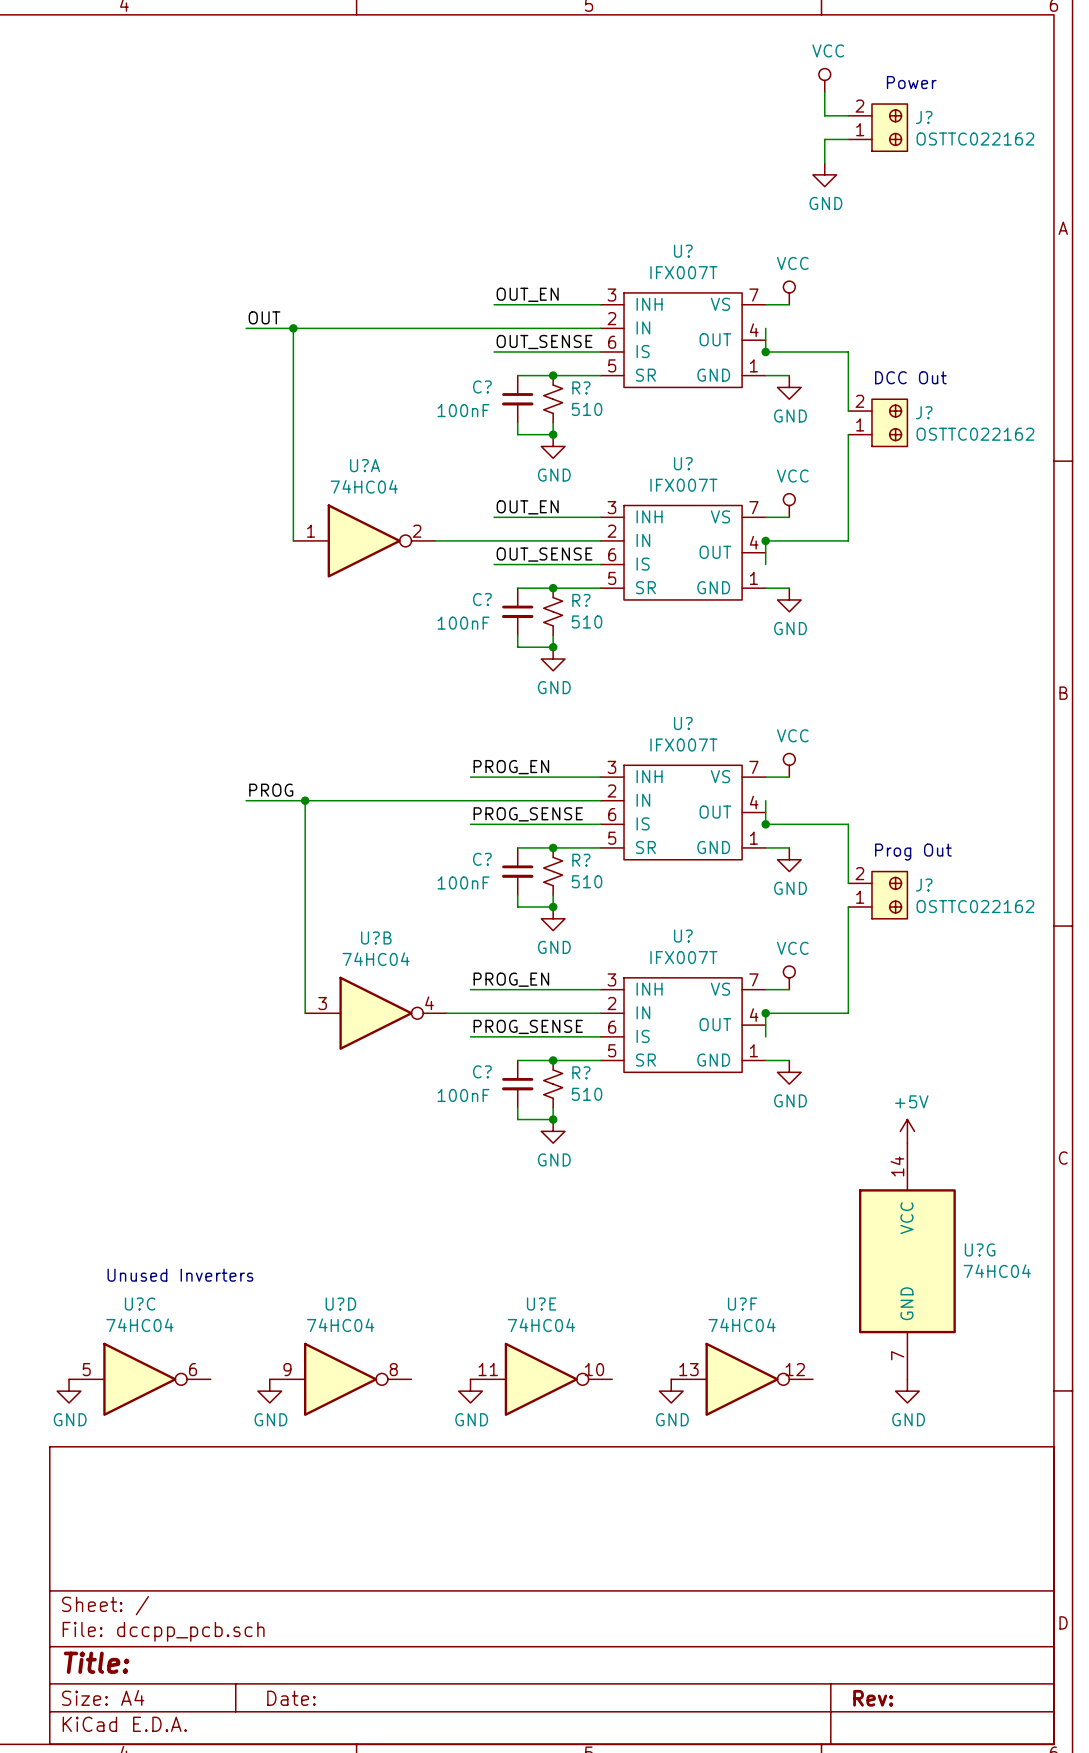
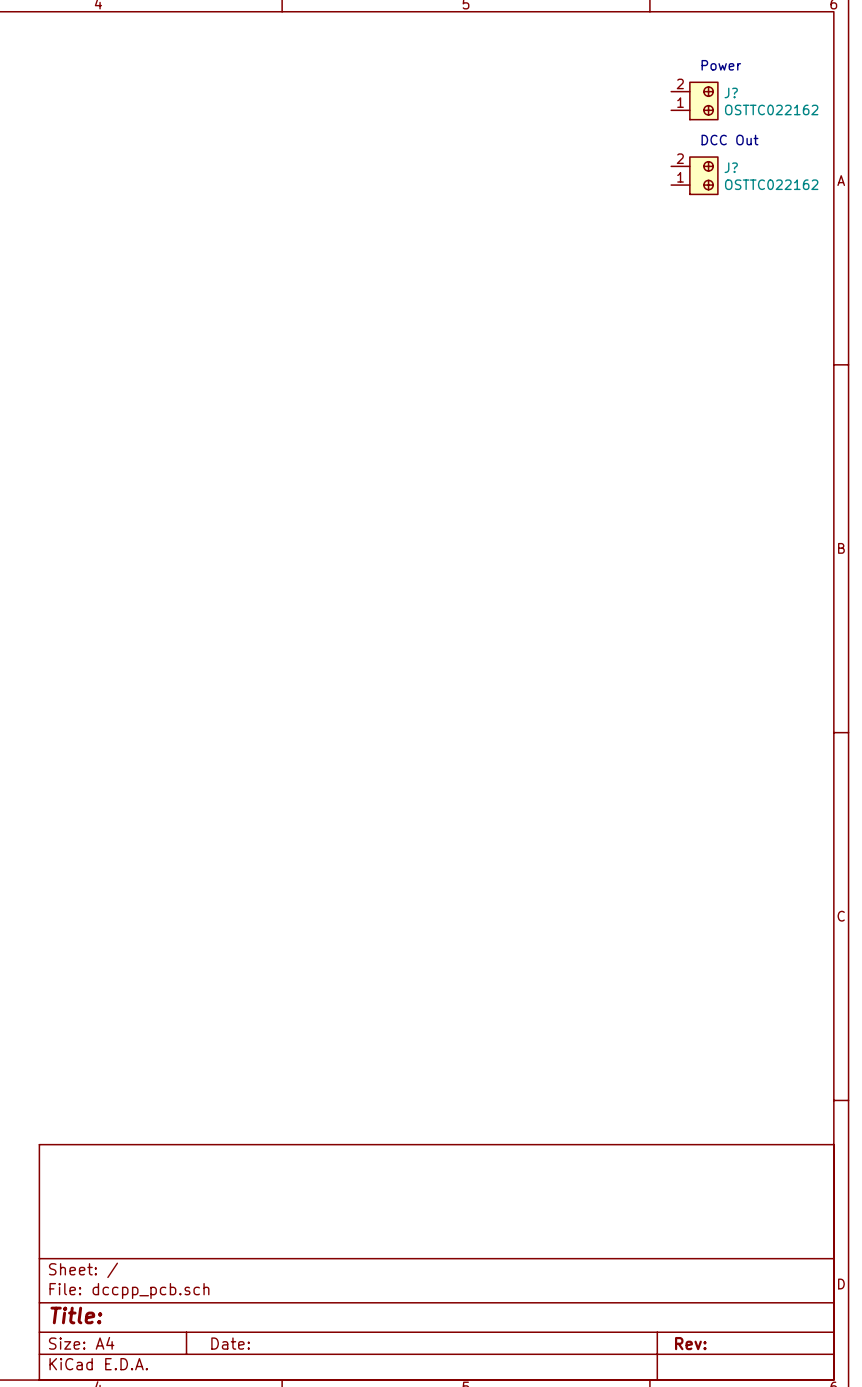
power symbol: VCC (824, 80) -> none
wire: (824, 92) (824, 115) (848, 115) -> none
wire: (848, 139) (824, 139) (824, 163) -> none
power symbol: GND (824, 174) -> none
power symbol: VCC (789, 292) -> none
label: OUT_EN (527, 294) -> none
wire: (494, 304) (600, 304) -> none
wire: (765, 304) (789, 304) -> none
label: OUT (264, 317) -> none
wire: (246, 328) (600, 328) -> none
wire: (293, 328) (293, 540) -> none
junction: (293, 328) -> none
wire: (765, 328) (765, 352) (848, 352) (848, 411) -> none
U?: IFX007T (683, 340) -> none
label: OUT_SENSE (544, 342) -> none
wire: (494, 352) (600, 352) -> none
junction: (765, 352) -> none
wire: (517, 375) (600, 375) -> none
junction: (553, 375) -> none
wire: (765, 375) (789, 375) -> none
text position: DCC Out (910, 377) -> DCC Out (729, 140)
power symbol: GND (789, 387) -> none
C?: 100nF (517, 399) -> none
R?: 510 (553, 399) -> none
wire: (517, 422) (517, 434) (553, 434) (553, 422) -> none
J? position: (877, 422) -> (694, 175)
junction: (553, 434) -> none
wire: (848, 434) (848, 540) (765, 540) (765, 564) -> none
power symbol: GND (553, 446) -> none
power symbol: VCC (789, 505) -> none
label: OUT_EN (527, 507) -> none
wire: (494, 517) (600, 517) -> none
wire: (765, 517) (789, 517) -> none
U?A: 74HC04 (364, 540) -> none
wire: (435, 540) (600, 540) -> none
junction: (765, 540) -> none
U?: IFX007T (683, 552) -> none
label: OUT_SENSE (544, 554) -> none
wire: (494, 564) (600, 564) -> none
wire: (517, 588) (600, 588) -> none
junction: (553, 588) -> none
wire: (765, 588) (789, 588) -> none
power symbol: GND (789, 599) -> none
C?: 100nF (517, 611) -> none
R?: 510 (553, 611) -> none
wire: (517, 635) (517, 647) (553, 647) (553, 635) -> none
junction: (553, 647) -> none
power symbol: GND (553, 659) -> none
power symbol: VCC (789, 765) -> none
label: PROG_EN (511, 767) -> none
wire: (470, 777) (600, 777) -> none
wire: (765, 777) (789, 777) -> none
label: PROG (271, 790) -> none
wire: (246, 800) (600, 800) -> none
wire: (305, 800) (305, 1013) -> none
junction: (305, 800) -> none
wire: (765, 800) (765, 824) (848, 824) (848, 883) -> none
U?: IFX007T (683, 812) -> none
label: PROG_SENSE (528, 814) -> none
wire: (470, 824) (600, 824) -> none
junction: (765, 824) -> none
wire: (517, 847) (600, 847) -> none
junction: (553, 847) -> none
wire: (765, 847) (789, 847) -> none
text: Prog Out (913, 852) -> none
power symbol: GND (789, 859) -> none
C?: 100nF (517, 871) -> none
R?: 510 (553, 871) -> none
wire: (517, 895) (517, 906) (553, 906) (553, 895) -> none
J?: OSTTC022162 (877, 895) -> none
junction: (553, 906) -> none
wire: (848, 906) (848, 1013) (765, 1013) (765, 1036) -> none
power symbol: GND (553, 918) -> none
power symbol: VCC (789, 977) -> none
label: PROG_EN (511, 979) -> none
wire: (470, 989) (600, 989) -> none
wire: (765, 989) (789, 989) -> none
U?B: 74HC04 (376, 1013) -> none
wire: (446, 1013) (600, 1013) -> none
junction: (765, 1013) -> none
U?: IFX007T (683, 1025) -> none
label: PROG_SENSE (528, 1026) -> none
wire: (470, 1036) (600, 1036) -> none
wire: (517, 1060) (600, 1060) -> none
junction: (553, 1060) -> none
wire: (765, 1060) (789, 1060) -> none
power symbol: GND (789, 1072) -> none
C?: 100nF (517, 1084) -> none
R?: 510 (553, 1084) -> none
wire: (517, 1107) (517, 1119) (553, 1119) (553, 1107) -> none
junction: (553, 1119) -> none
power symbol: GND (553, 1131) -> none
power symbol: +5V (907, 1131) -> none
U?G: 74HC04 (907, 1261) -> none
text: Unused Inverters (180, 1275) -> none
U?C: 74HC04 (139, 1379) -> none
U?D: 74HC04 (340, 1379) -> none
U?E: 74HC04 (541, 1379) -> none
U?F: 74HC04 (742, 1379) -> none
power symbol: GND (69, 1391) -> none
power symbol: GND (269, 1391) -> none
power symbol: GND (470, 1391) -> none
power symbol: GND (671, 1391) -> none
power symbol: GND (907, 1391) -> none

